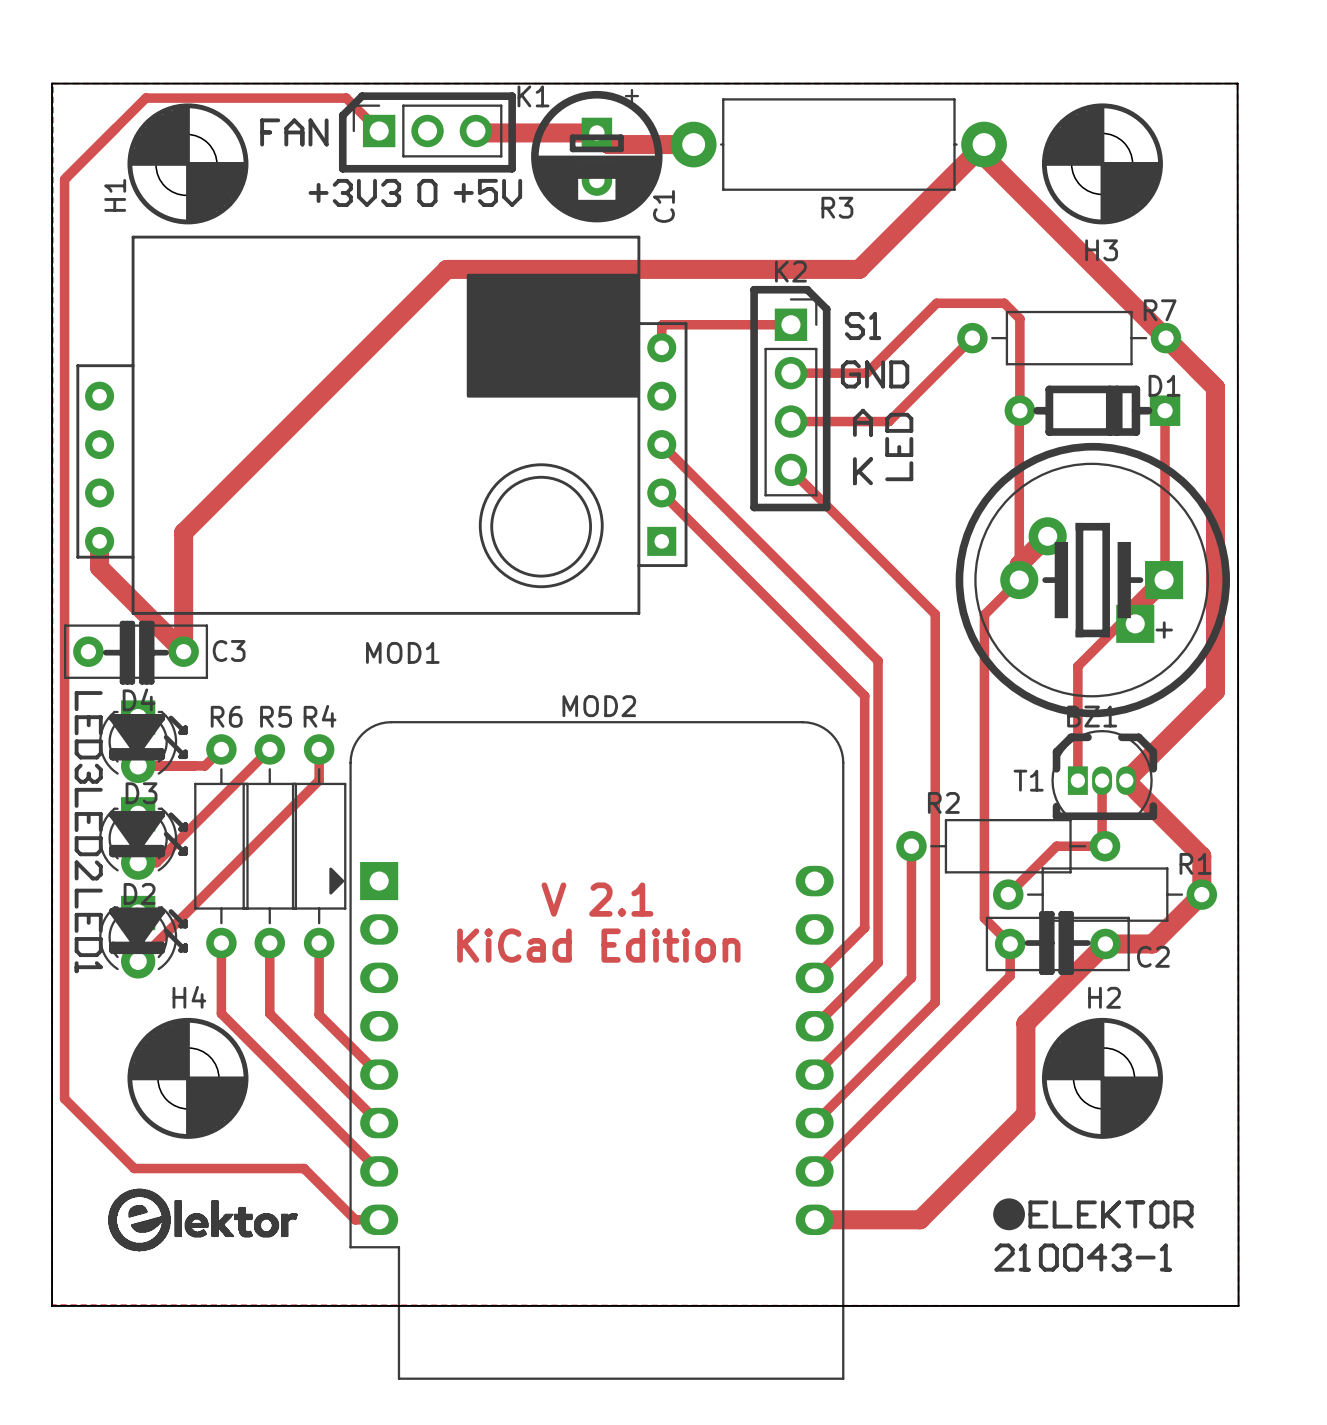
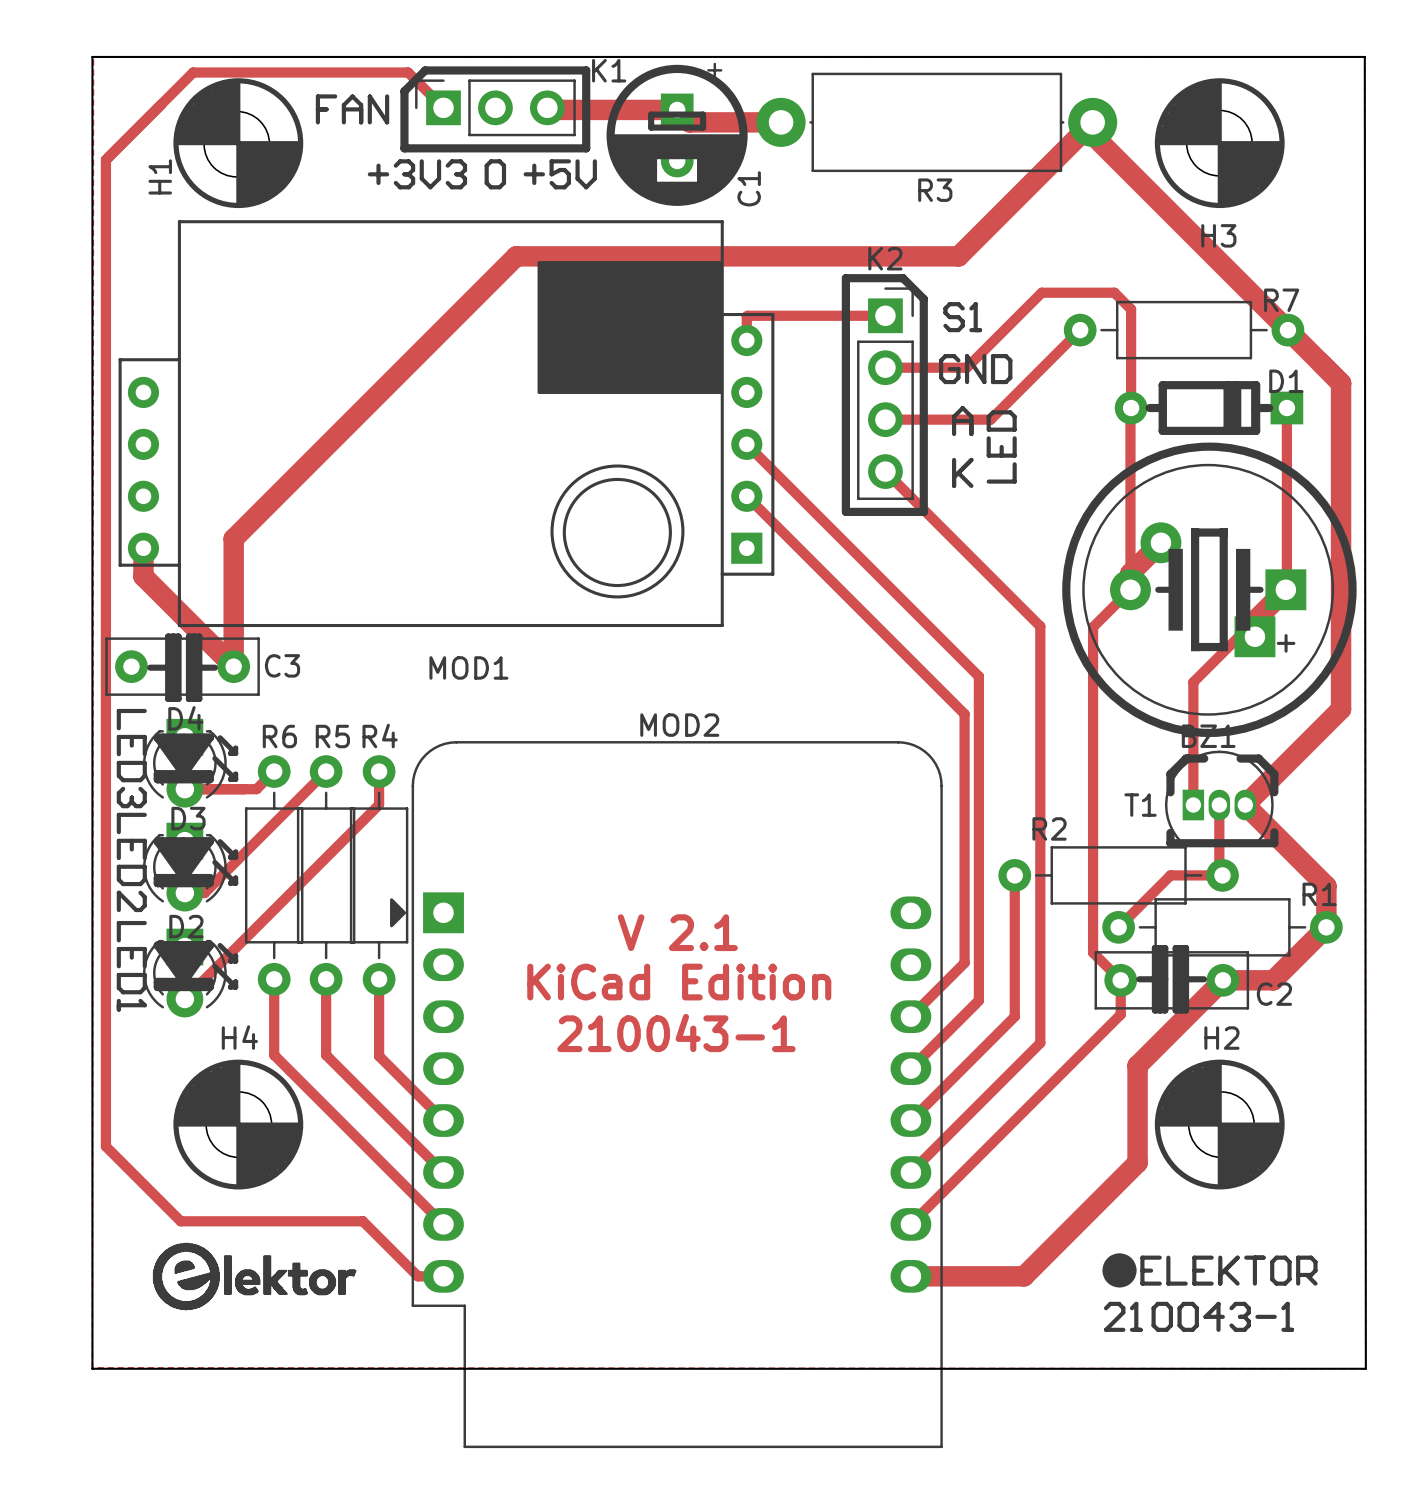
text: none -> 210043-1 (676, 1033)

